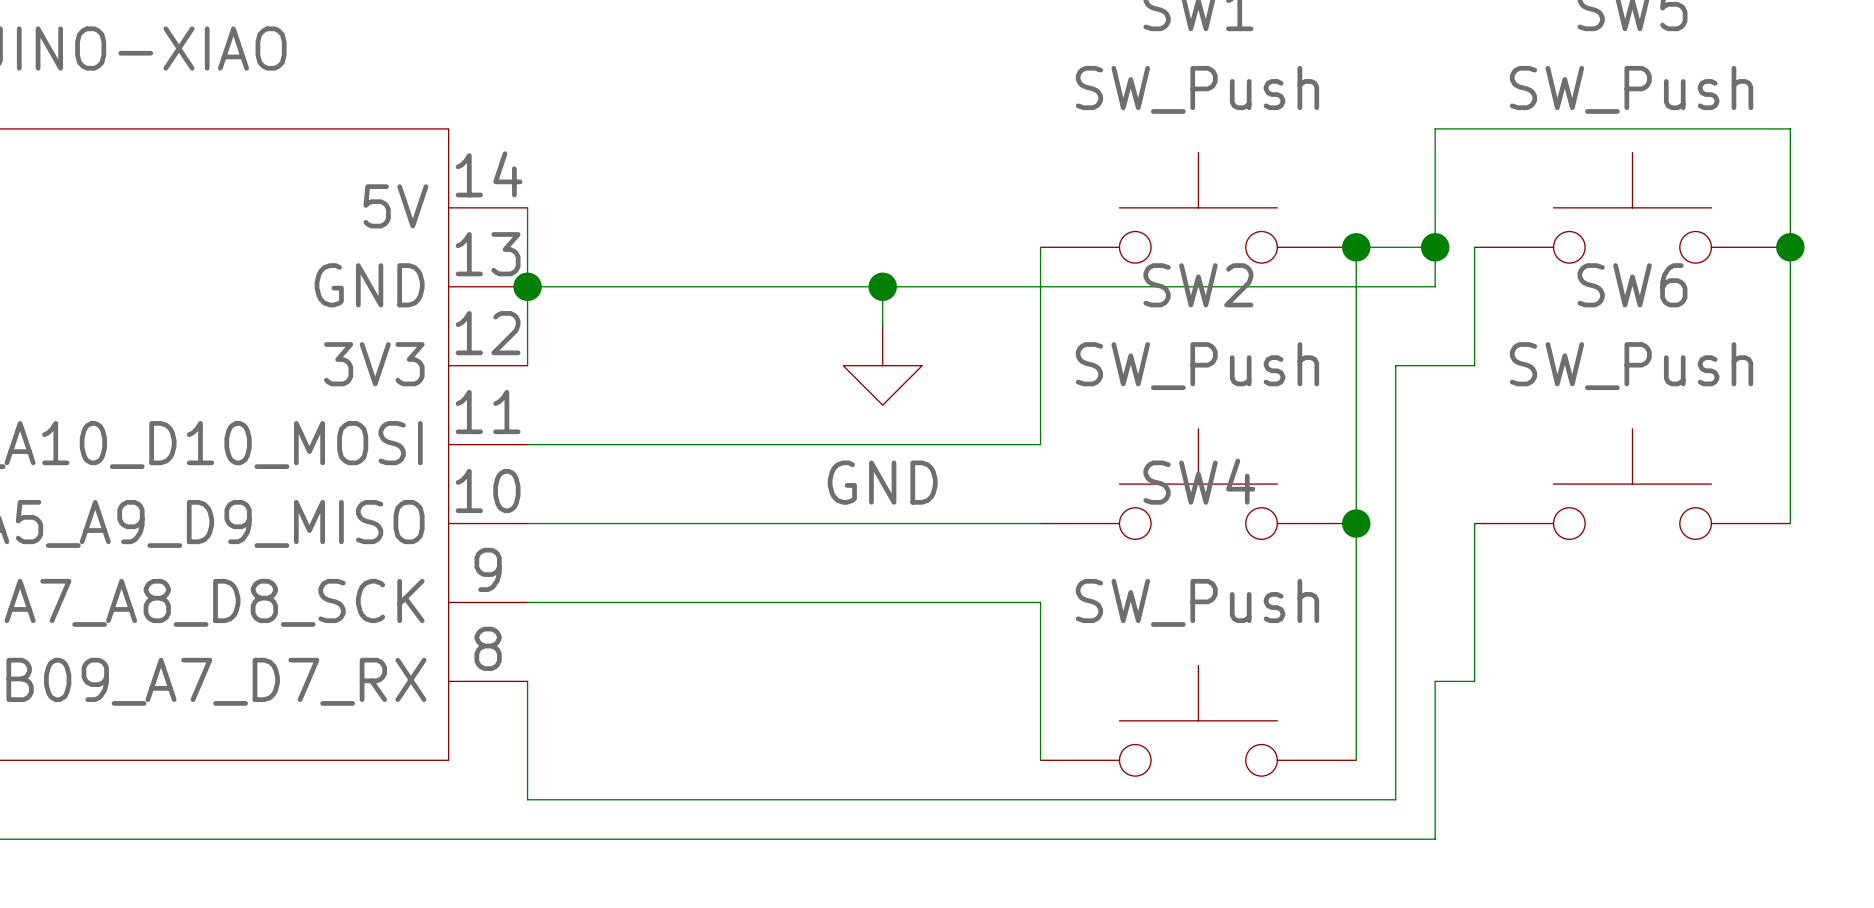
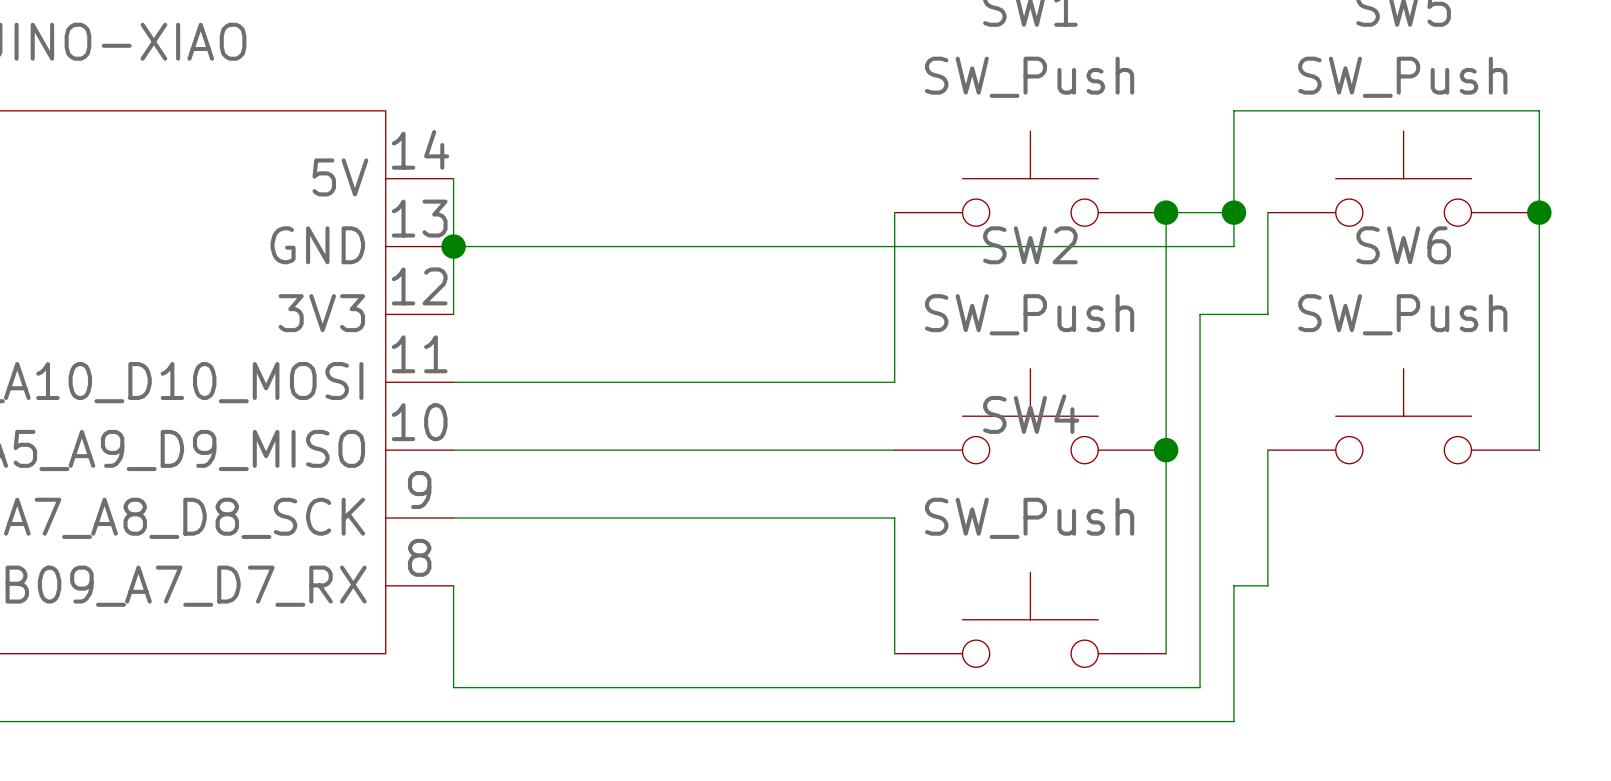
wire: (882, 286) (882, 326) -> none
junction: (882, 286) -> none
power symbol: GND (882, 365) -> none

